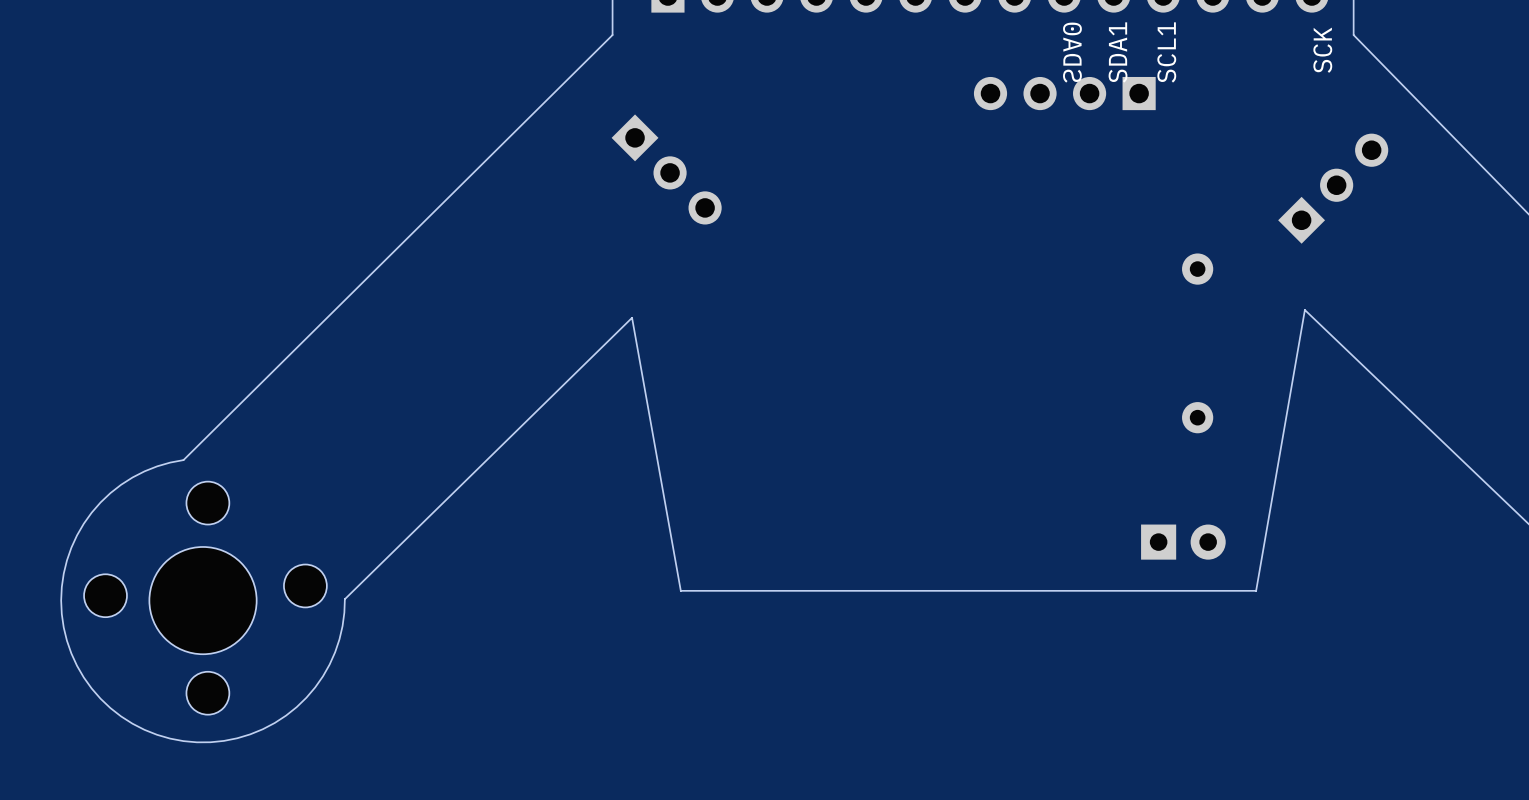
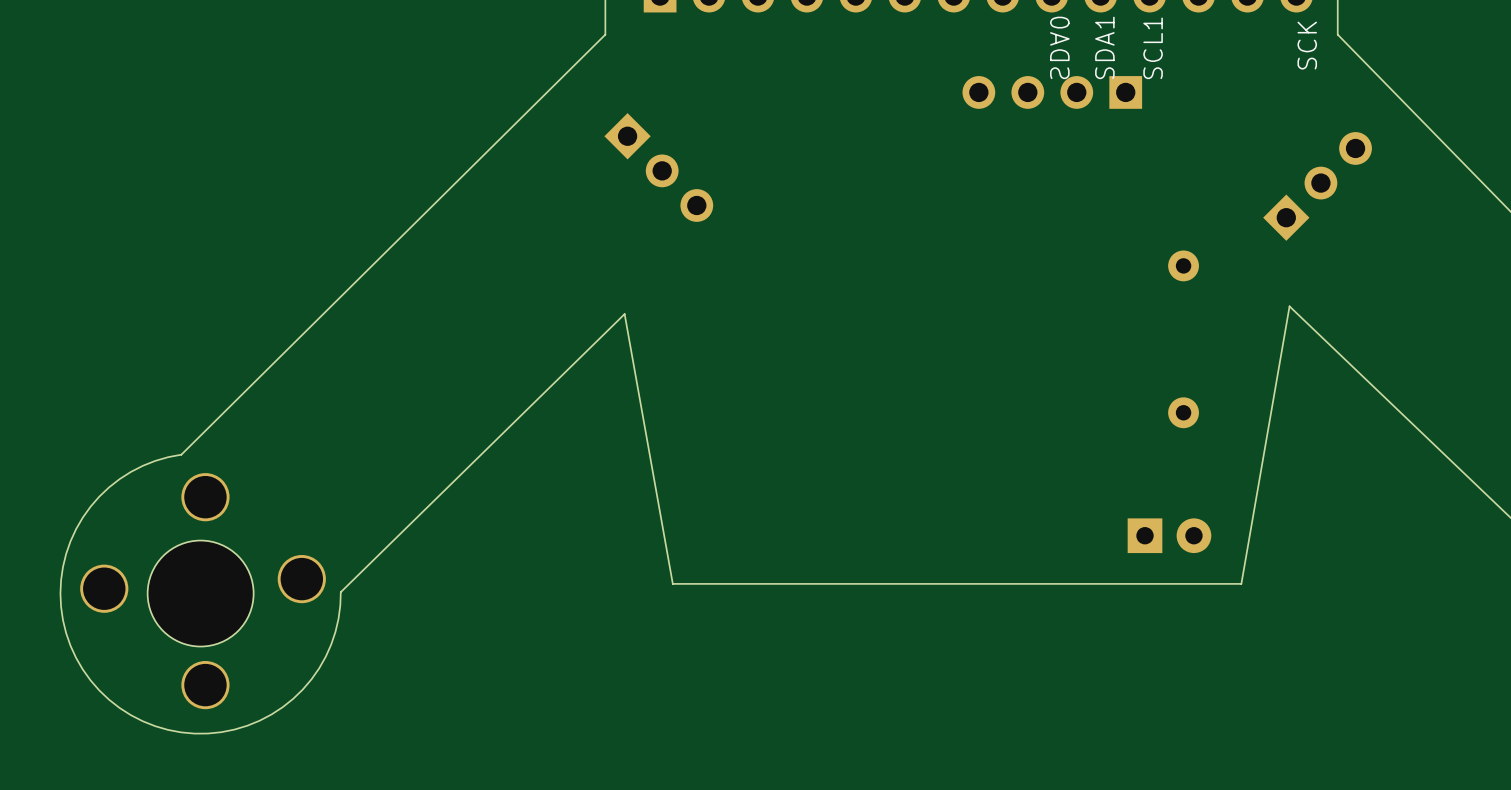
part footprint: [186, 481, 230, 525] -> [181, 473, 230, 522]
part footprint: [283, 564, 327, 608] -> [277, 554, 326, 604]
part footprint: [84, 574, 127, 618] -> [80, 564, 129, 613]
part footprint: [186, 671, 230, 715] -> [181, 661, 230, 710]

